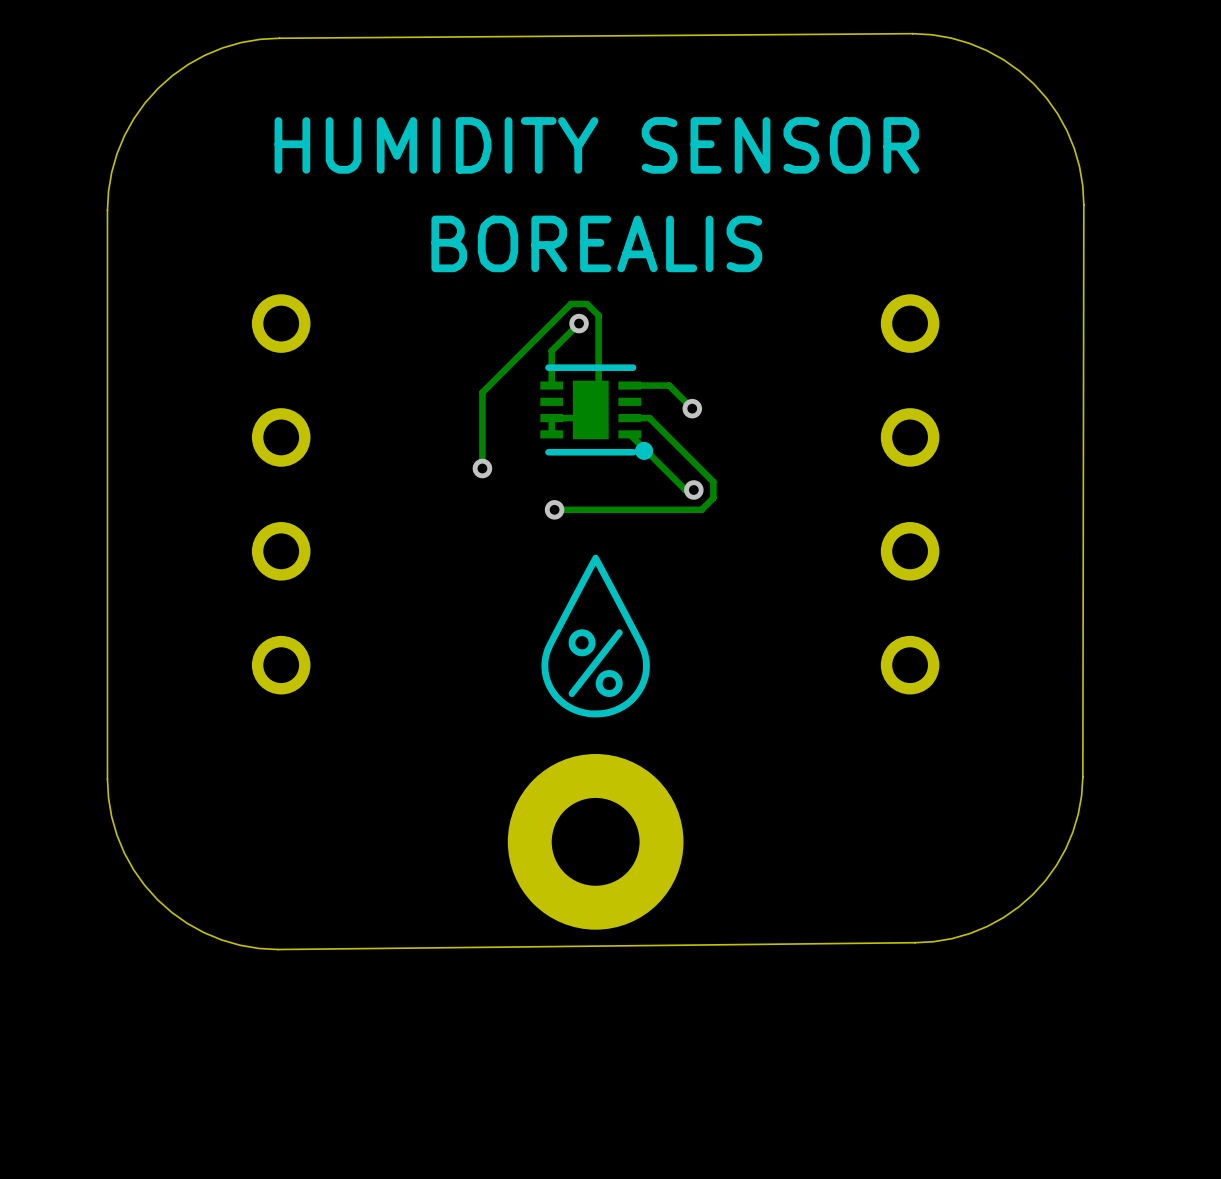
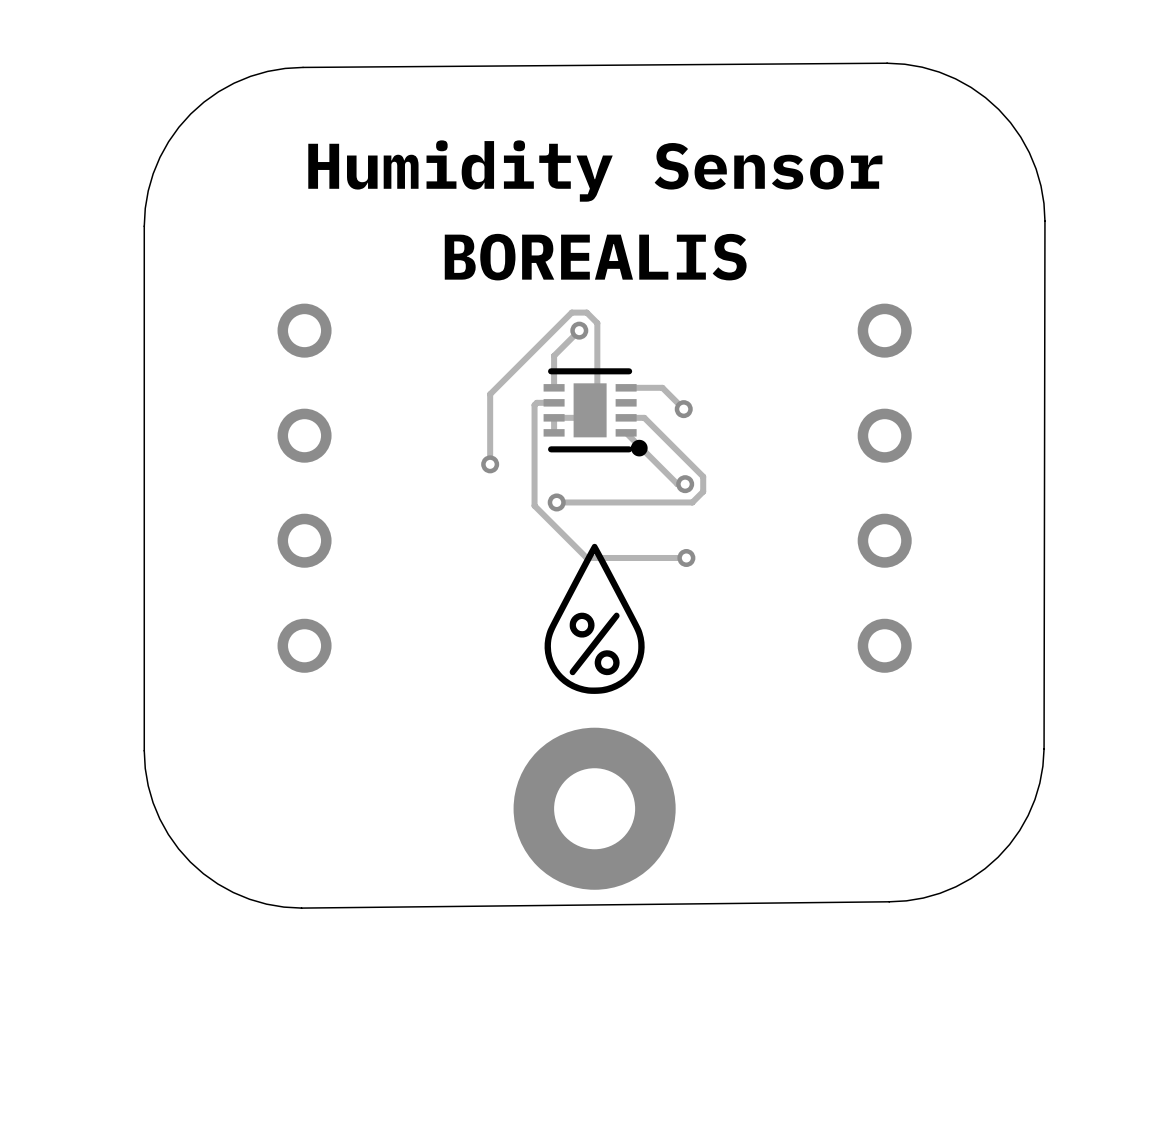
text: HUMIDITY SENSOR (596, 145) -> Humidity Sensor (595, 171)
track: none -> (554, 402) (536, 402) (534, 405) (534, 505) (586, 557) (686, 557)
via: none -> (686, 557)

